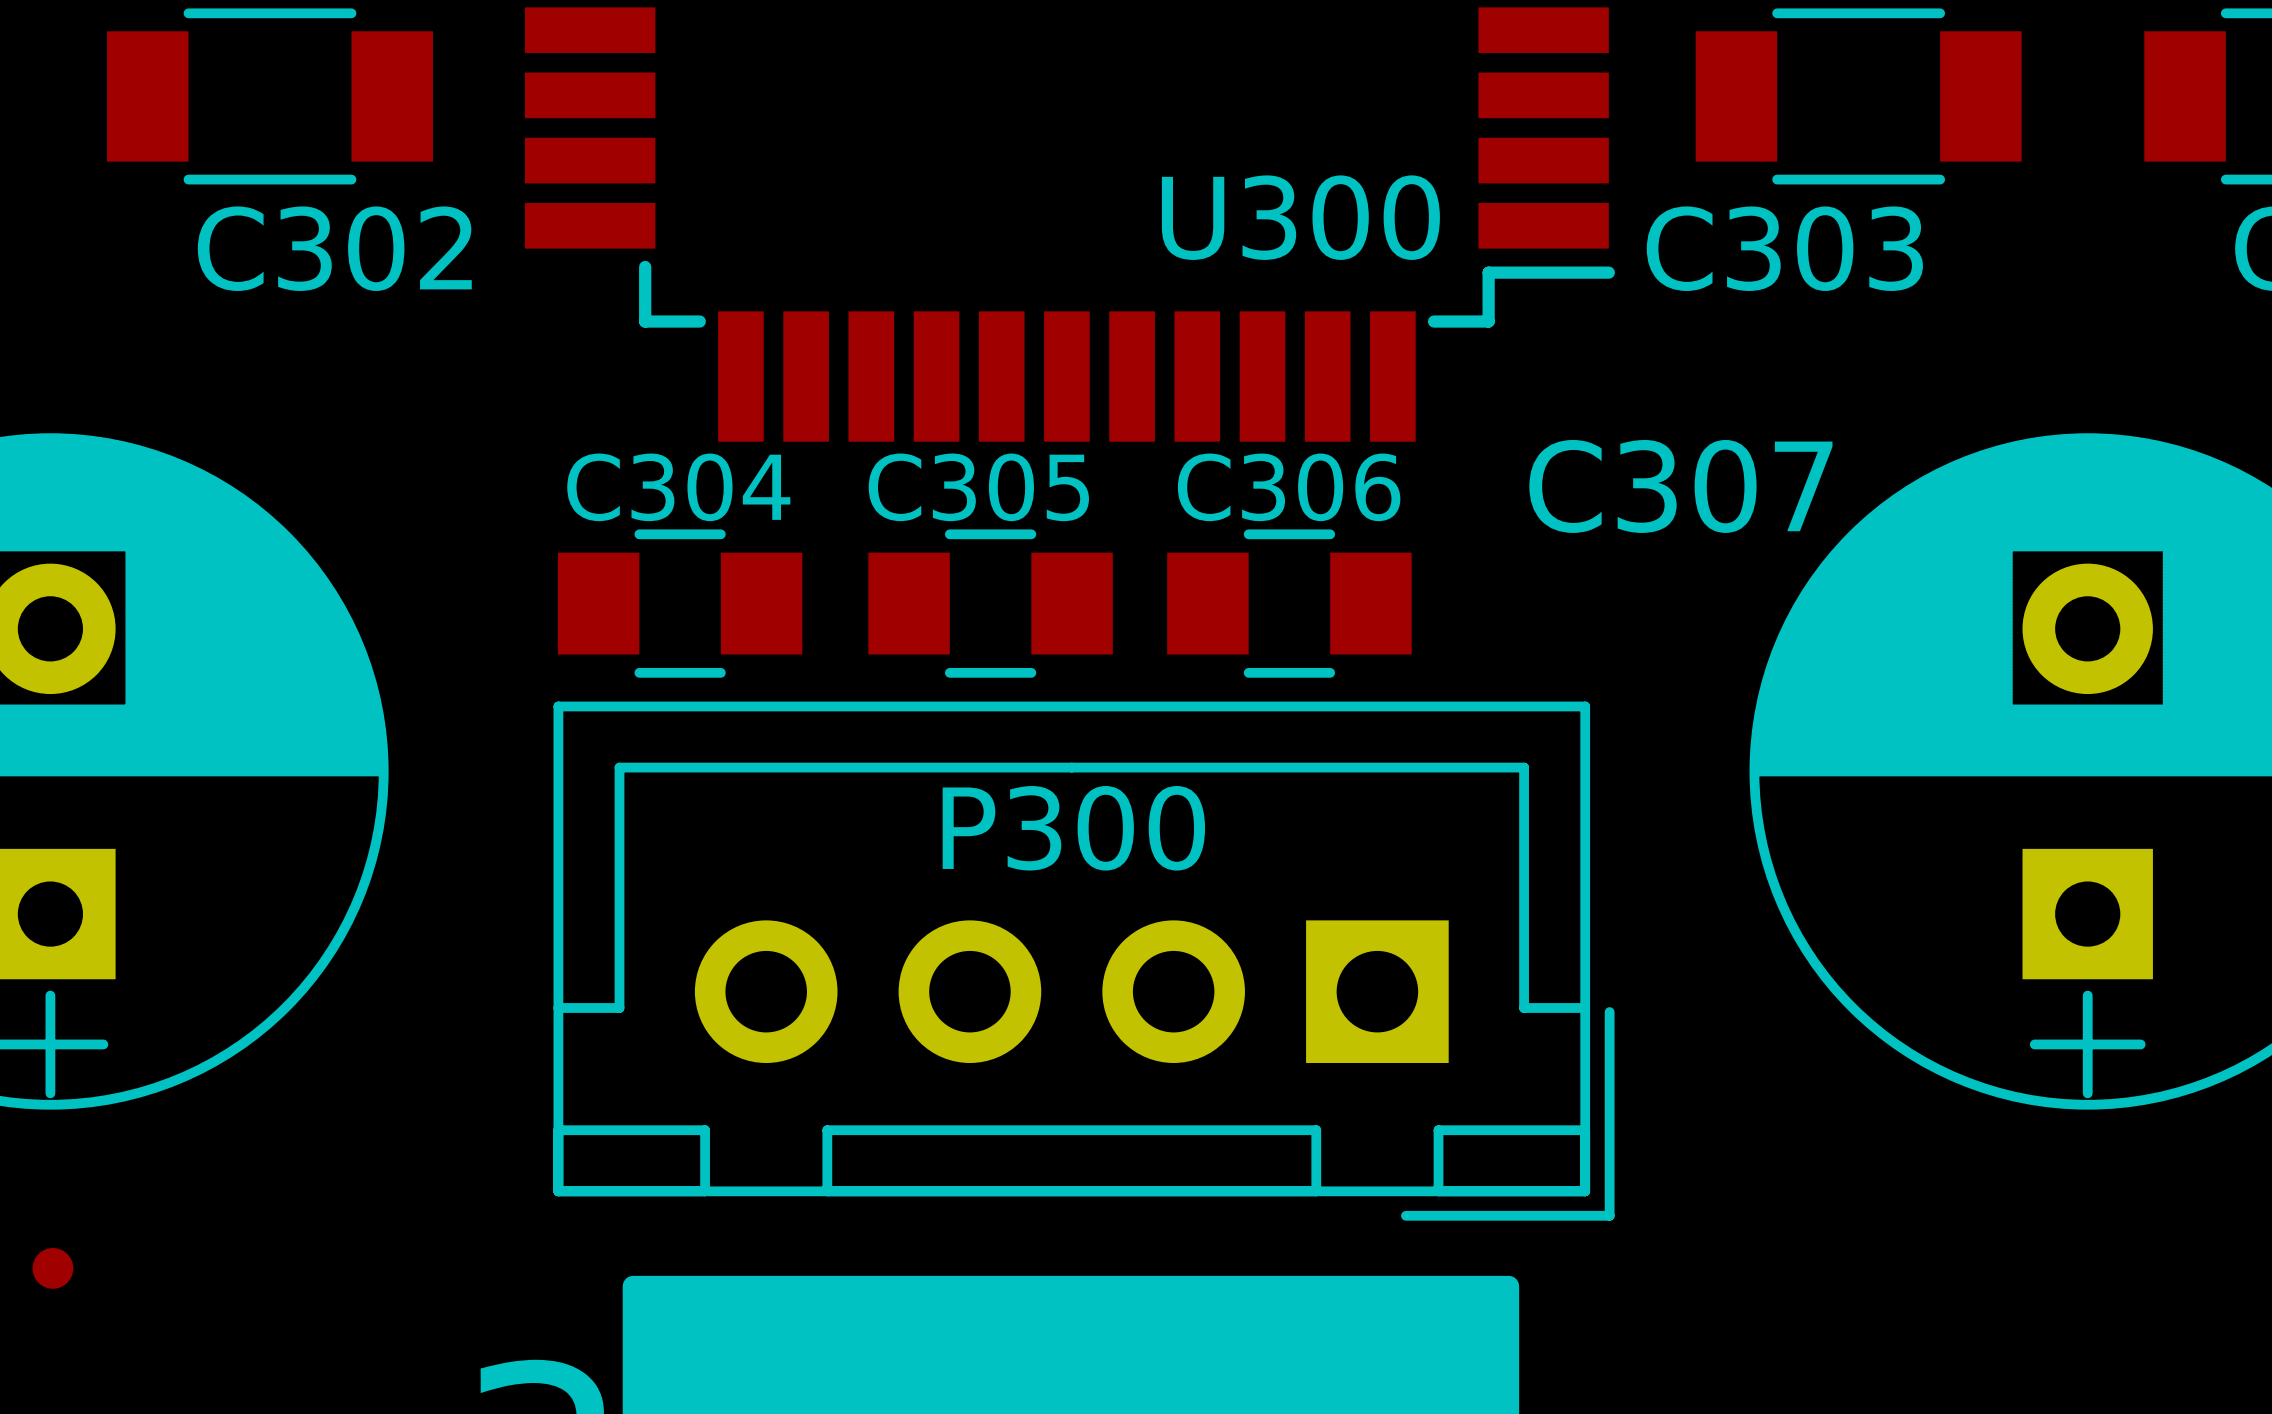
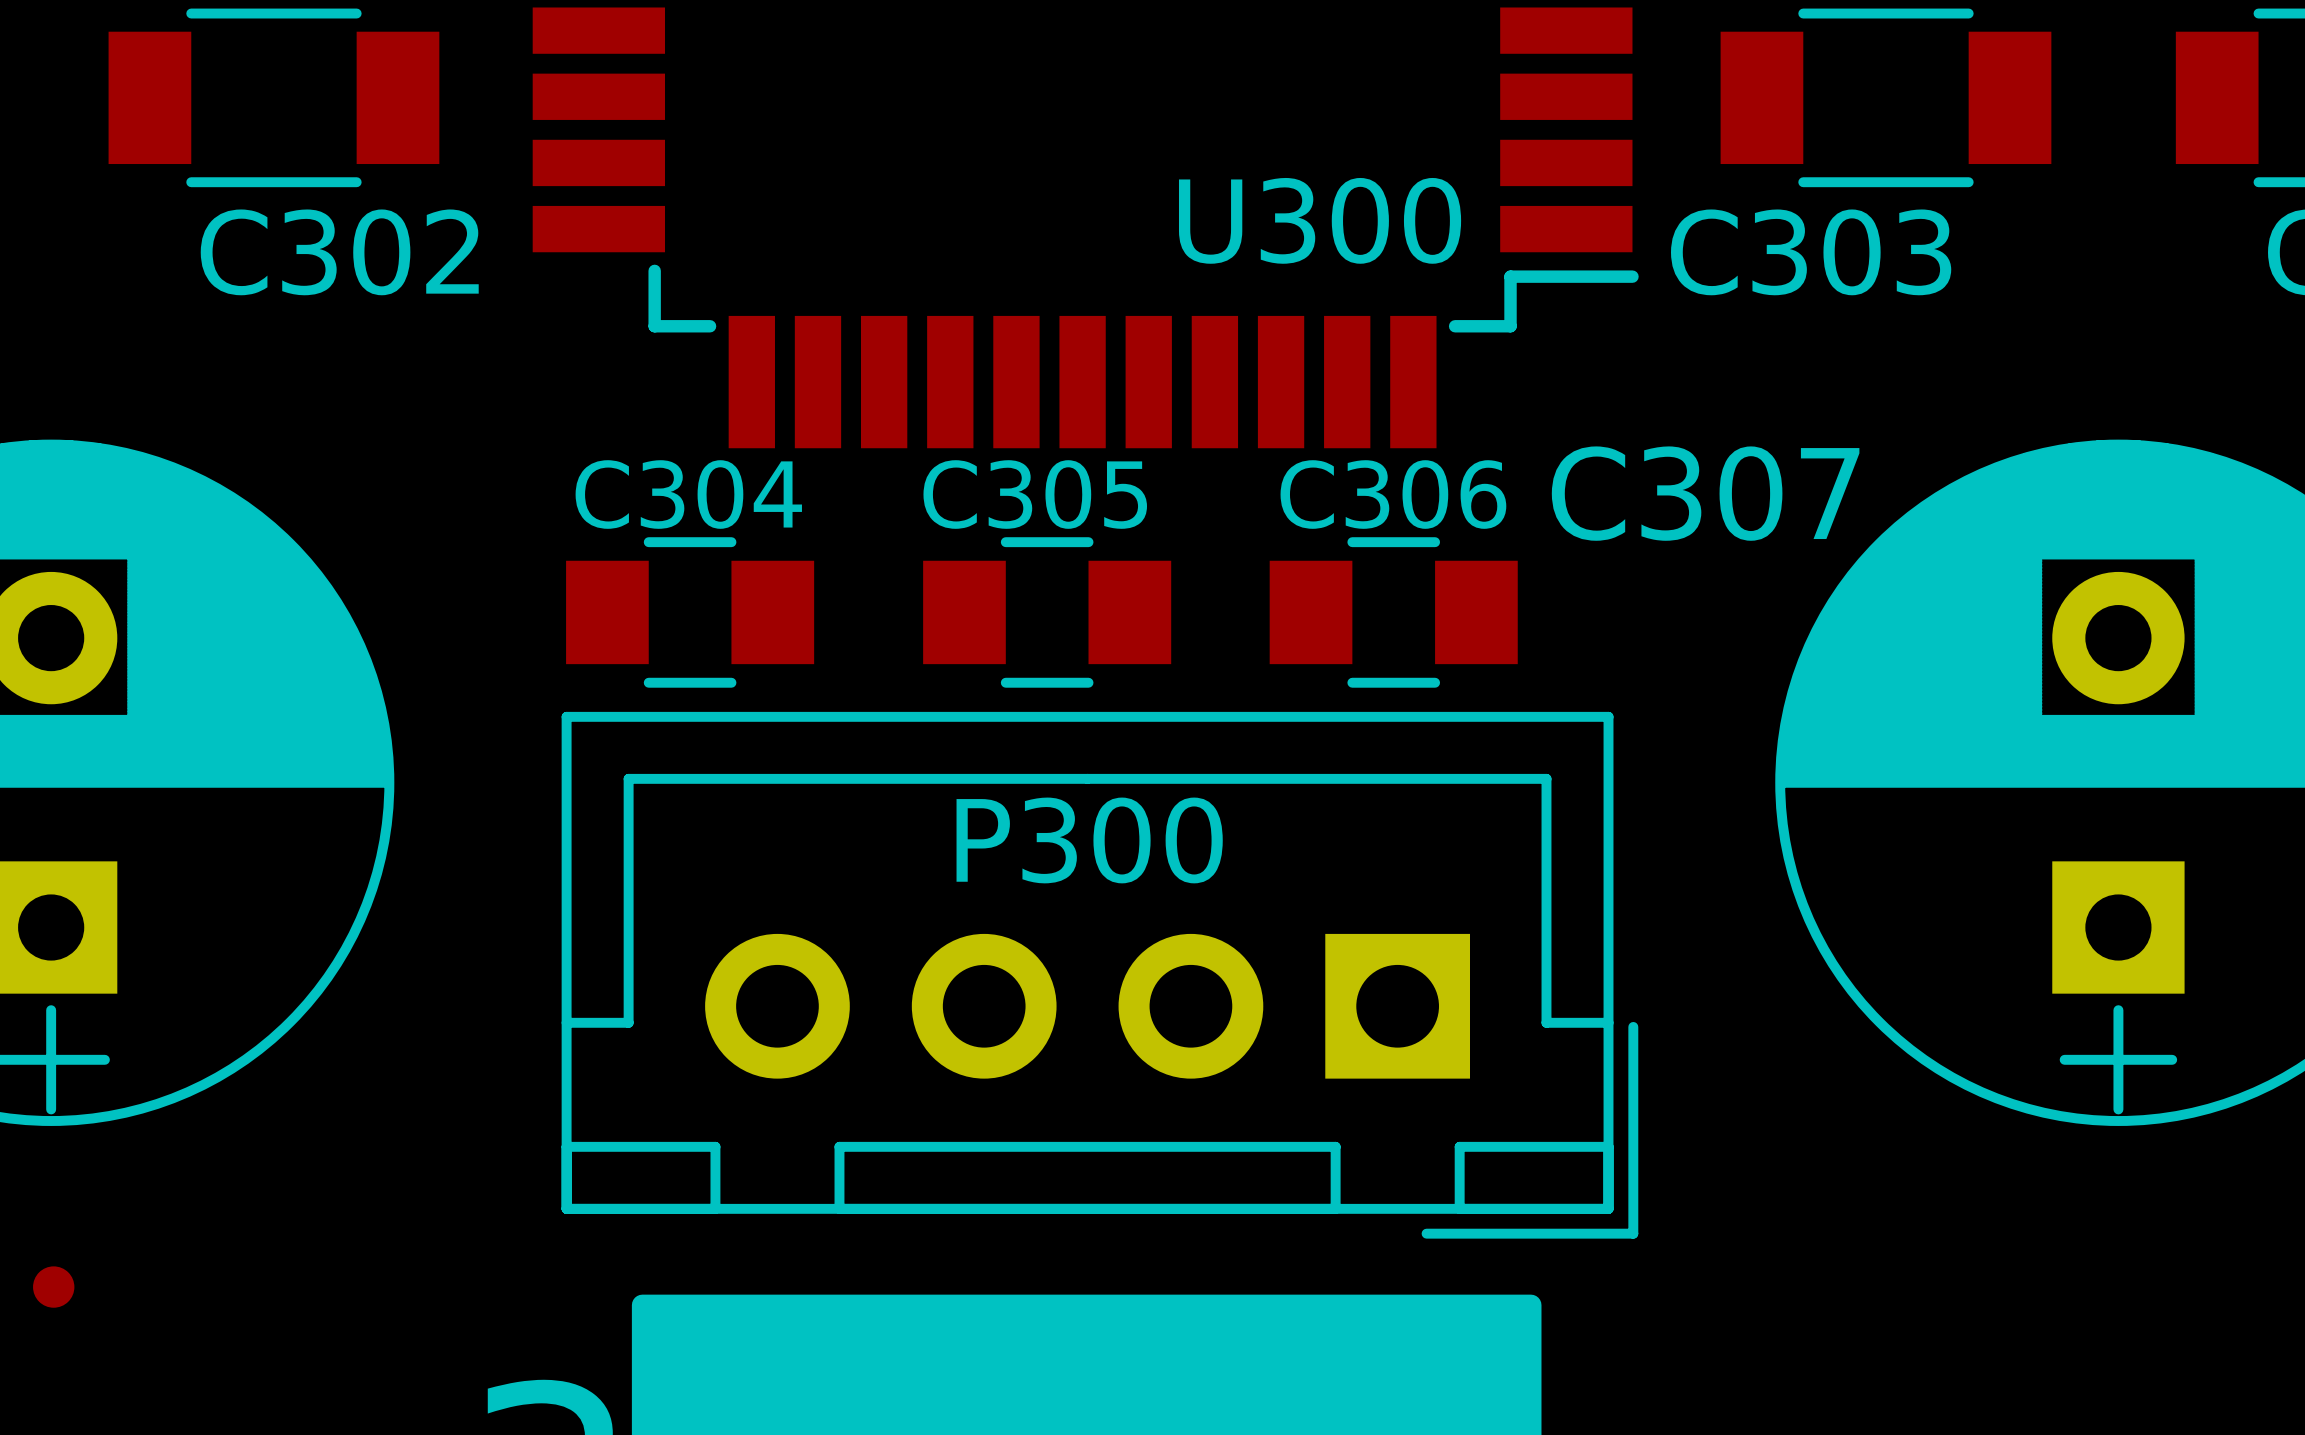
C305 position: (990, 603) -> (1047, 612)
C306 position: (1289, 603) -> (1393, 612)

